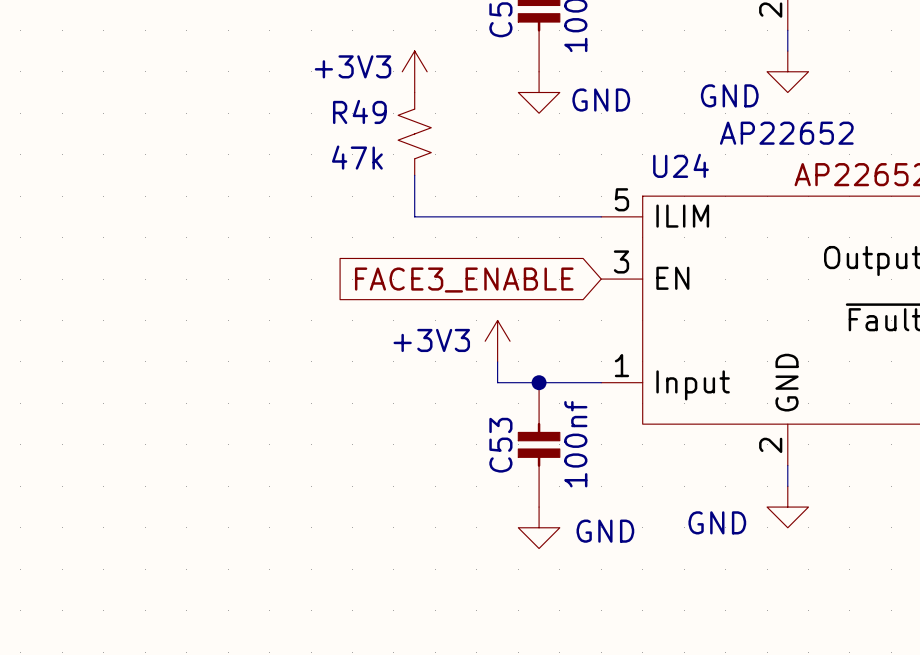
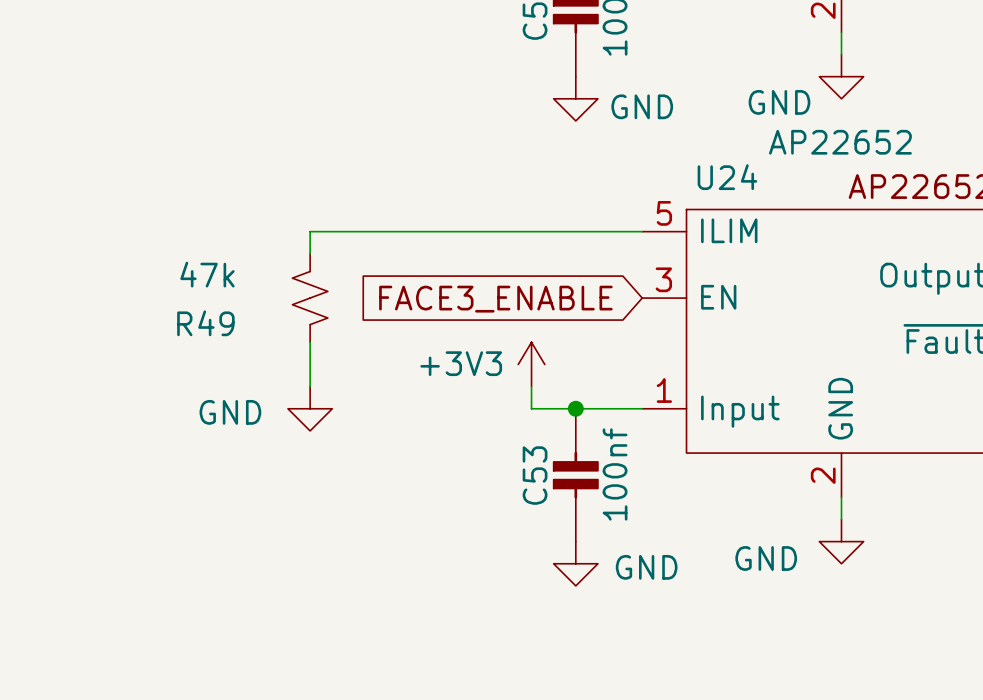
power symbol: +3V3 (414, 71) -> none
R49 name position: R49 (359, 111) -> R49 (205, 323)
R49 position: (414, 133) -> (310, 298)
R49 value position: 47k (357, 157) -> 47k (207, 274)
wire: (414, 175) (414, 216) -> (310, 253) (310, 231) (442, 231)
wire: none -> (310, 342) (310, 386)
power symbol: none -> GND (310, 408)

